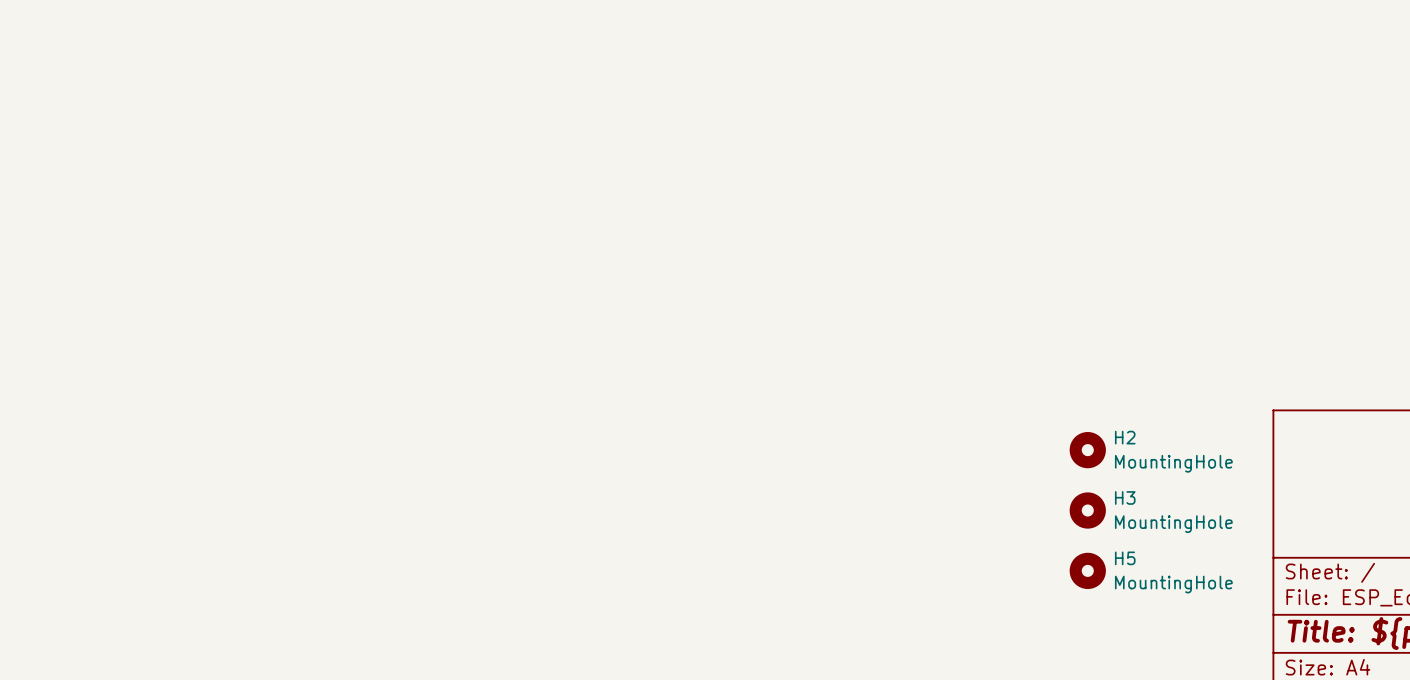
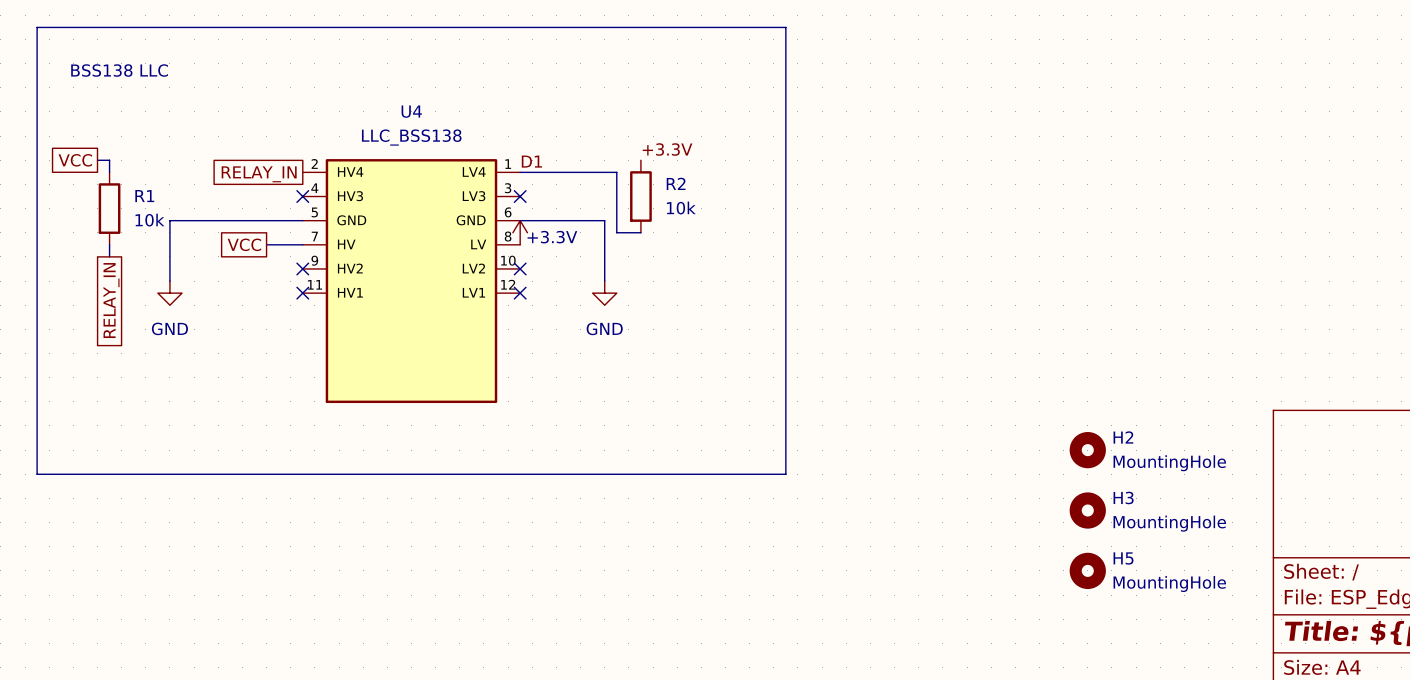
line: none -> (37, 27) (785, 27) (785, 474) (37, 474) (37, 27)
text: none -> BSS138 LLC (119, 70)
label: none -> +3.3V (667, 149)
global label: none -> VCC (75, 160)
wire: none -> (97, 160) (109, 160) (109, 172)
label: none -> D1 (531, 161)
global label: none -> RELAY_IN (259, 174)
wire: none -> (520, 172) (616, 172) (616, 232) (640, 232)
no-connect mark: none -> (302, 196)
no-connect mark: none -> (520, 196)
R2: none -> 10k (640, 196)
R1: none -> 10k (109, 208)
wire: none -> (302, 220) (169, 220) (169, 281)
wire: none -> (520, 220) (604, 220) (604, 281)
power symbol: none -> +3.3V (520, 232)
wire: none -> (109, 244) (109, 256)
global label: none -> VCC (244, 244)
wire: none -> (266, 244) (302, 244)
no-connect mark: none -> (302, 268)
no-connect mark: none -> (520, 268)
U4: none -> LLC_BSS138 (411, 281)
power symbol: none -> GND (169, 293)
no-connect mark: none -> (302, 293)
no-connect mark: none -> (520, 293)
power symbol: none -> GND (604, 293)
global label: none -> RELAY_IN (111, 300)

